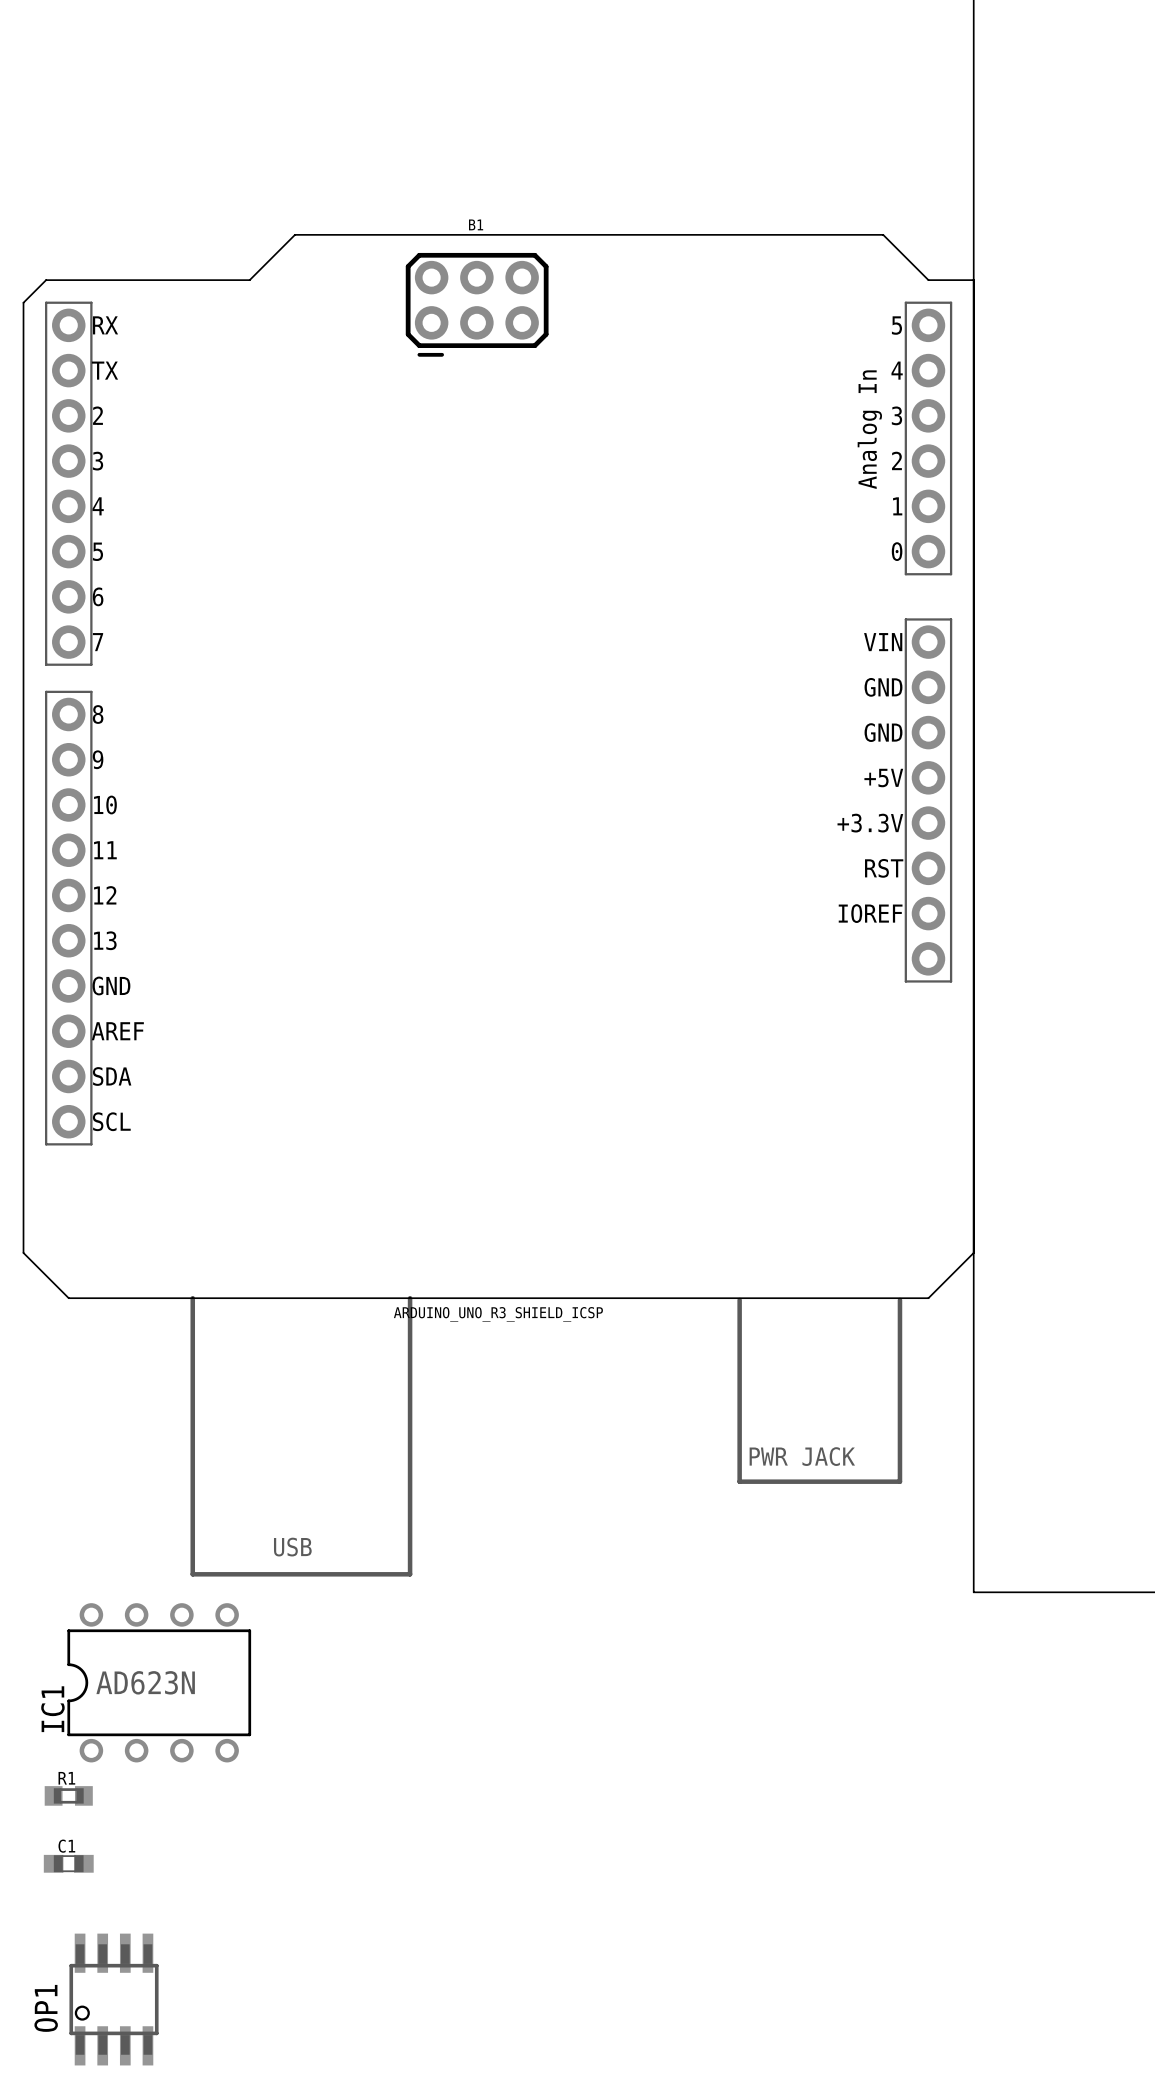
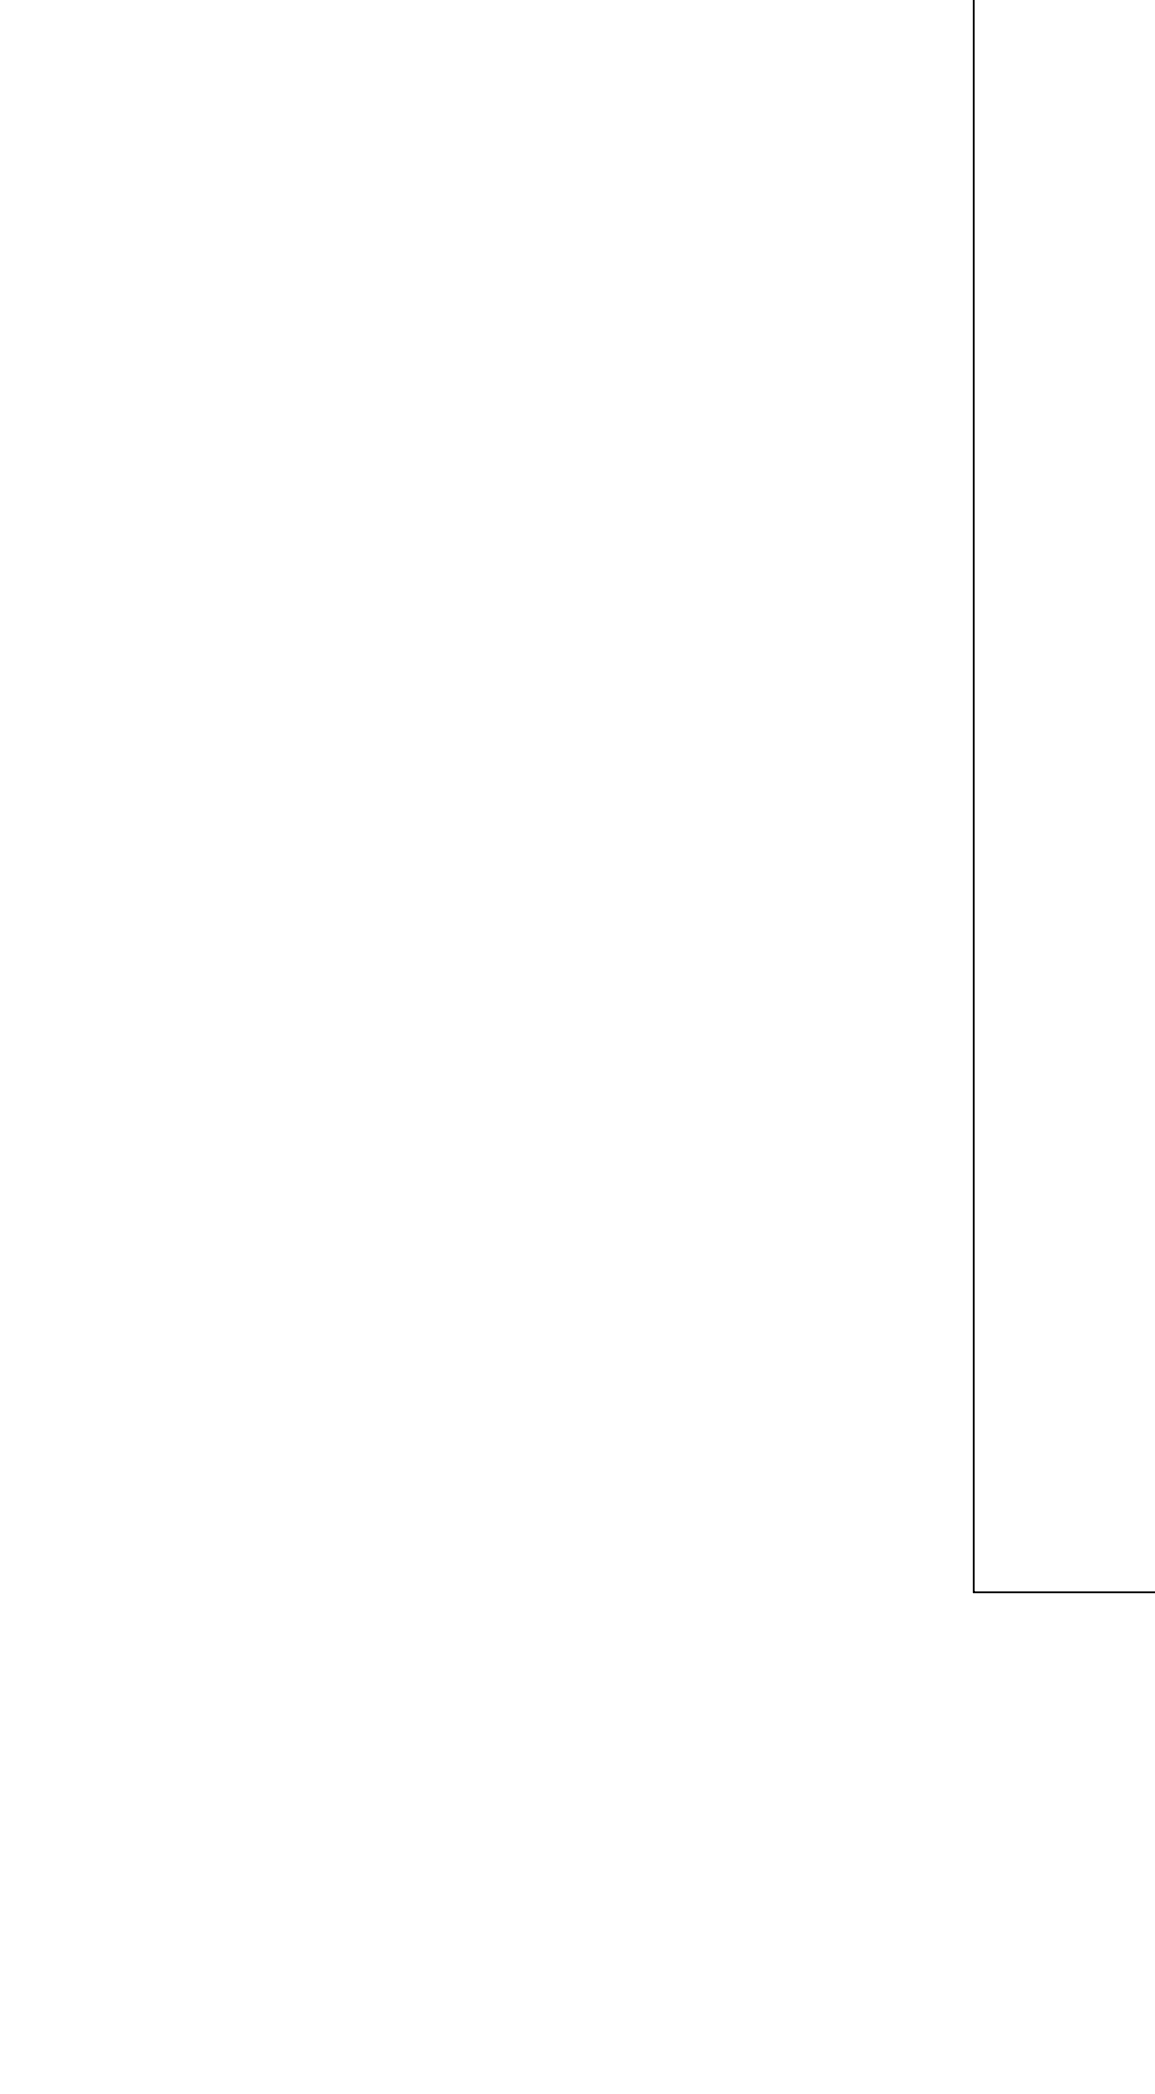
B1: ARDUINO_UNO_R3_SHIELD_ICSP (498, 905) -> none
IC1: AD623N (159, 1682) -> none
R1: (68, 1795) -> none
C1: (68, 1863) -> none
OP1: (114, 1999) -> none

